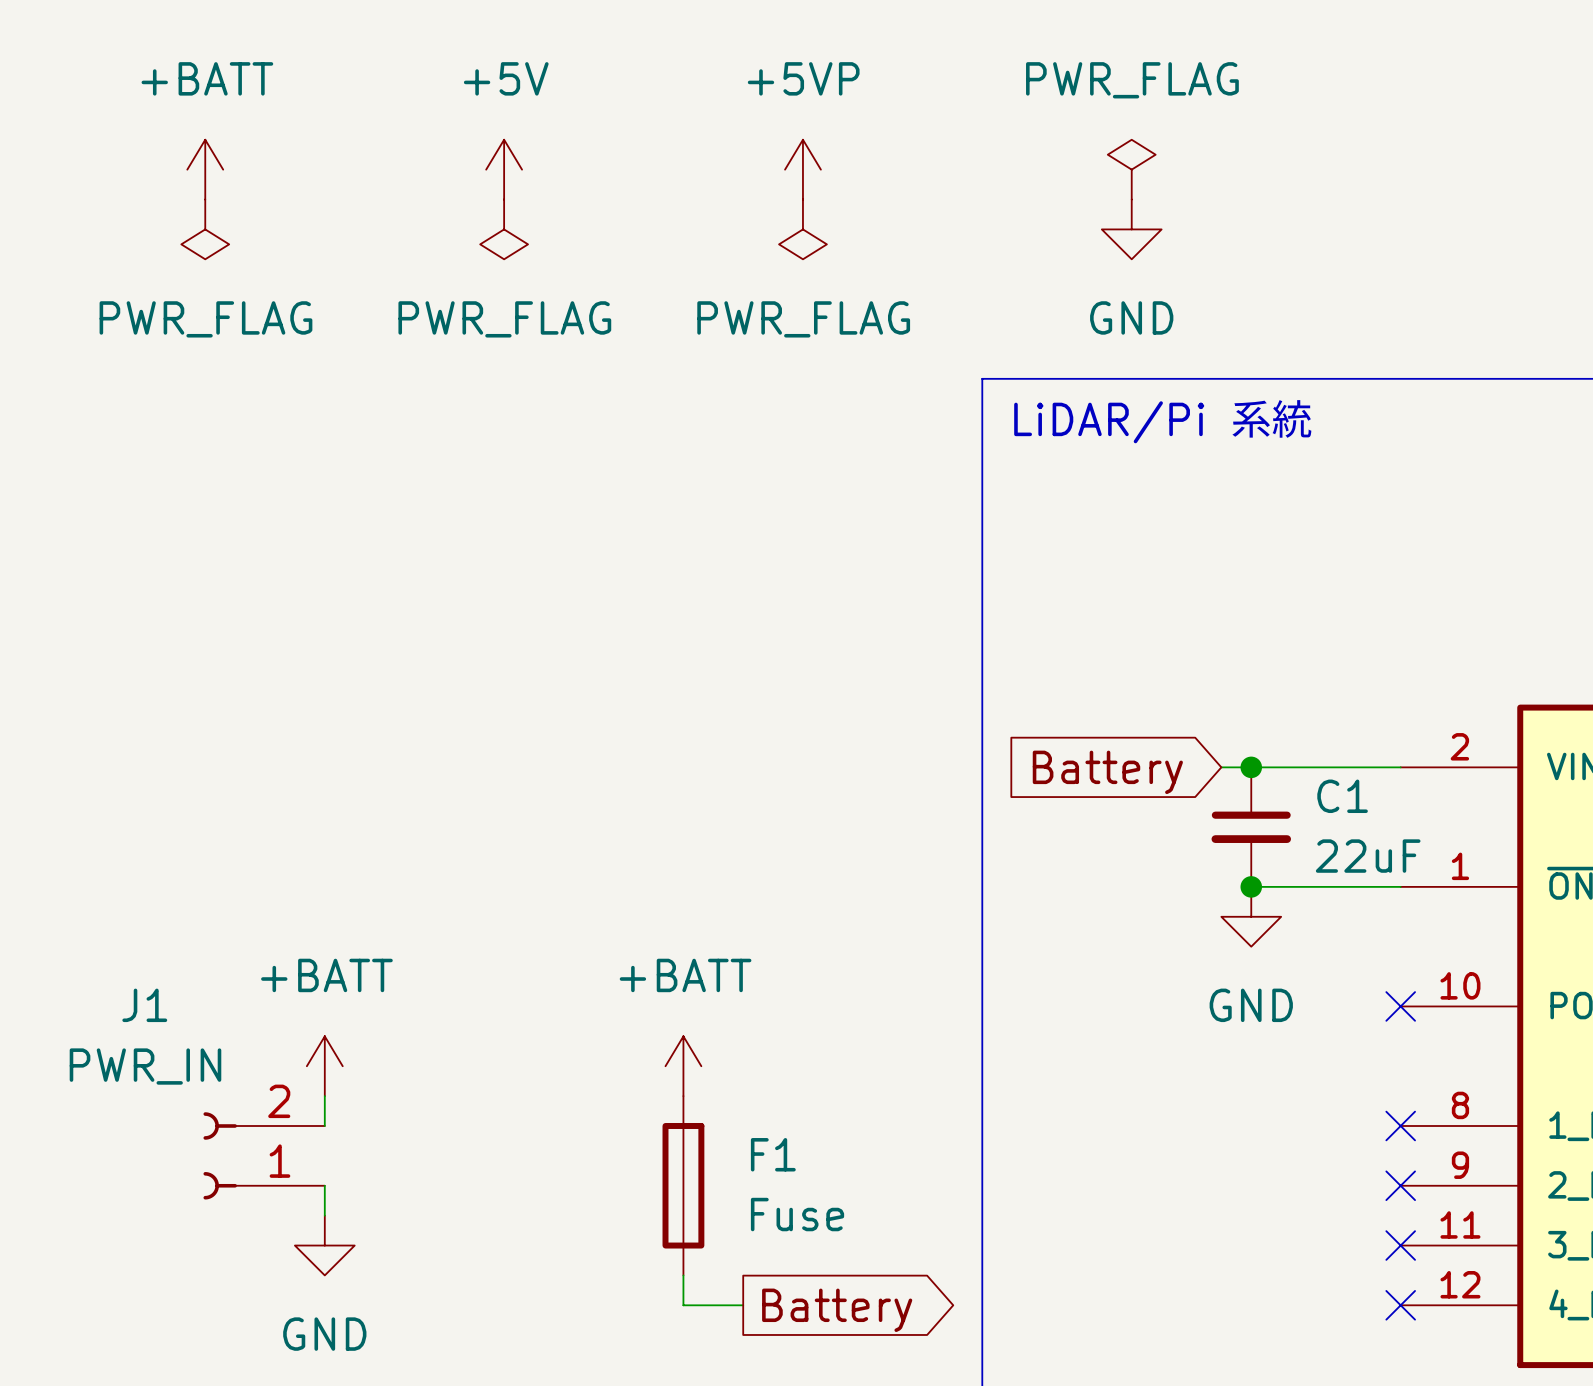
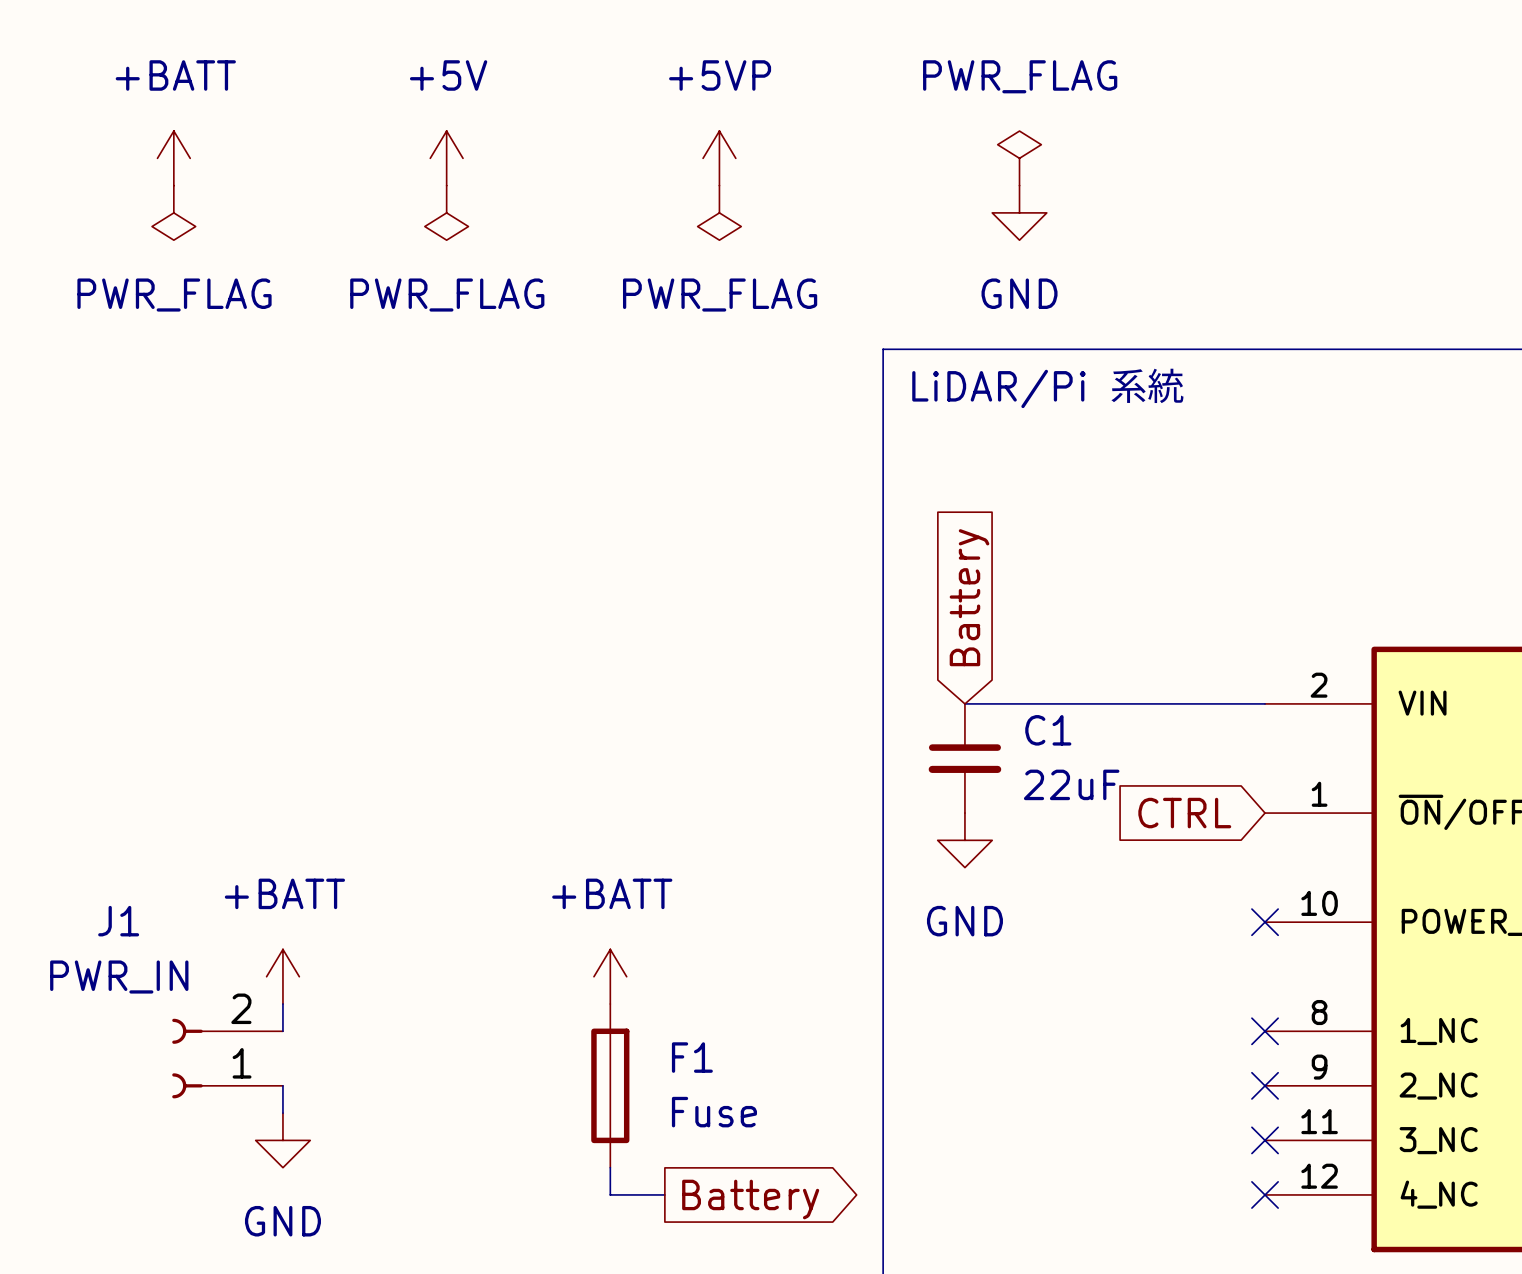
junction: (1251, 767) -> none
global label rotation: 0° (1107, 772) -> 90° clockwise (969, 597)
C1 position: (1251, 827) -> (964, 758)
wire: (1251, 886) (1400, 886) -> (964, 703) (1101, 703)
junction: (1251, 886) -> none
global label: none -> CTRL (1184, 813)
power symbol position: GND (1251, 916) -> GND (964, 840)

